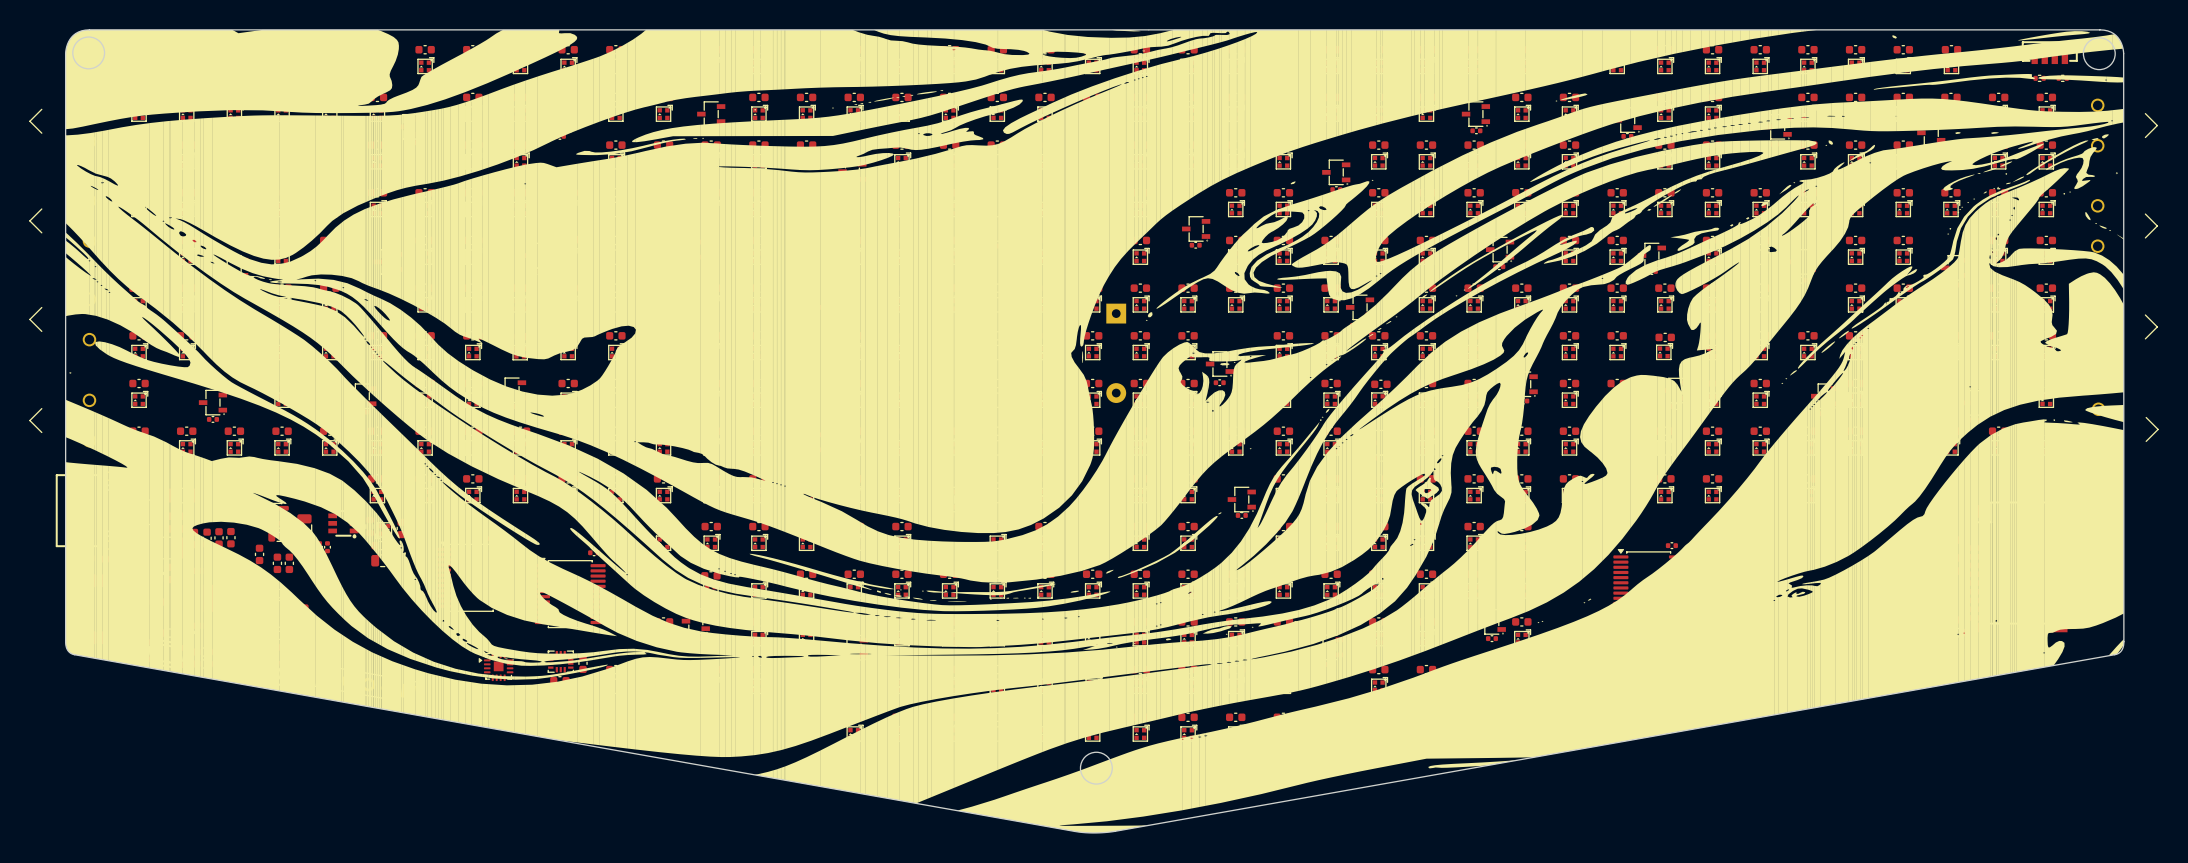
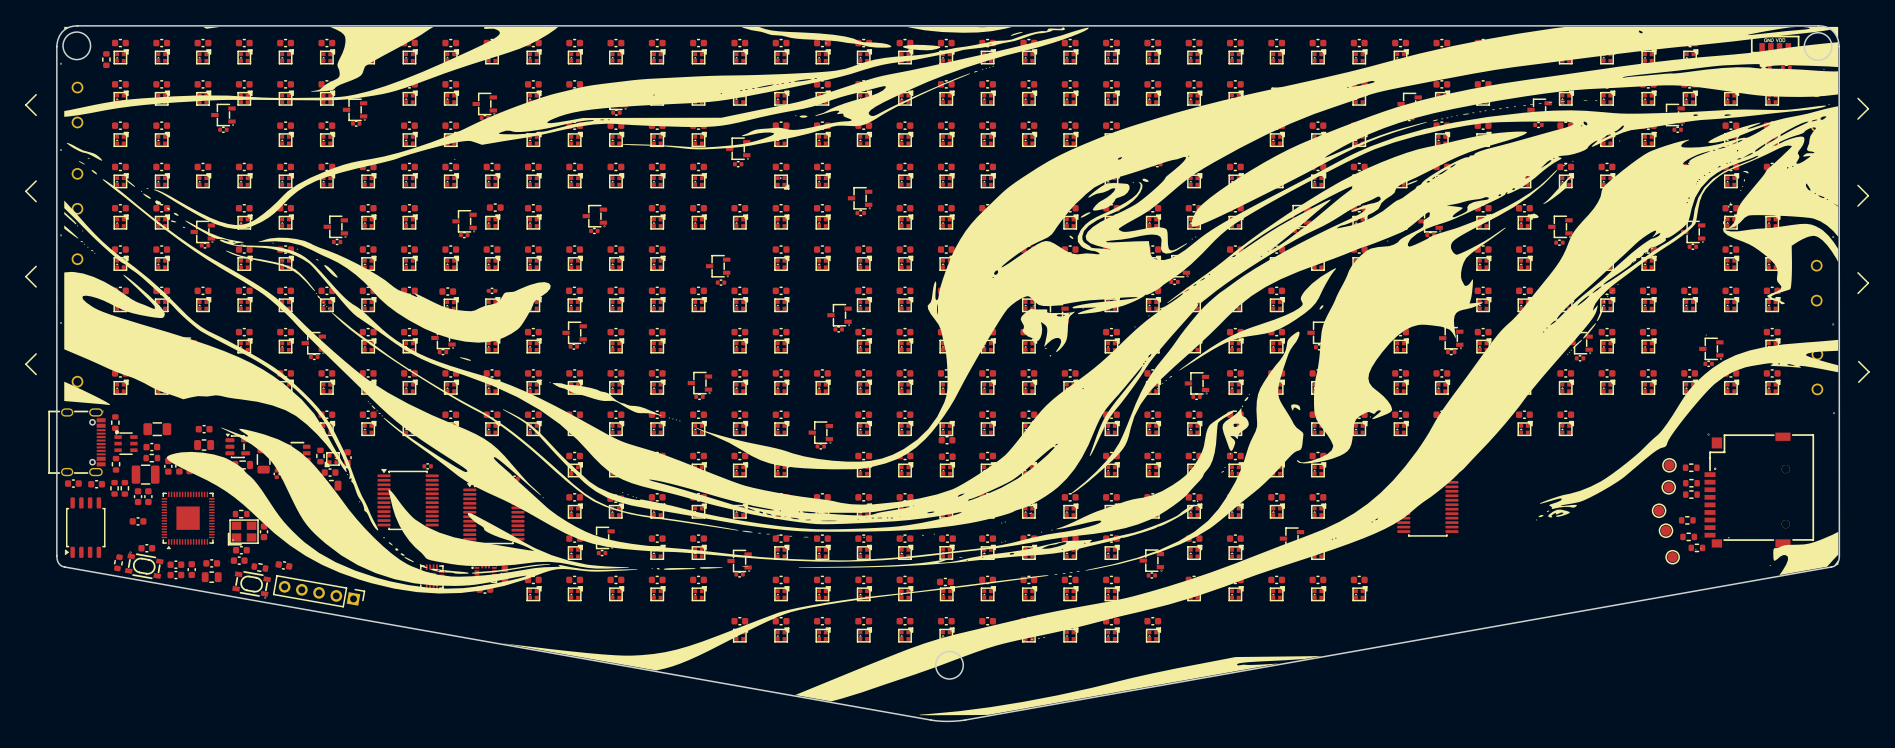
drawing shape: [65, 29, 2124, 833] -> [64, 26, 1839, 723]

